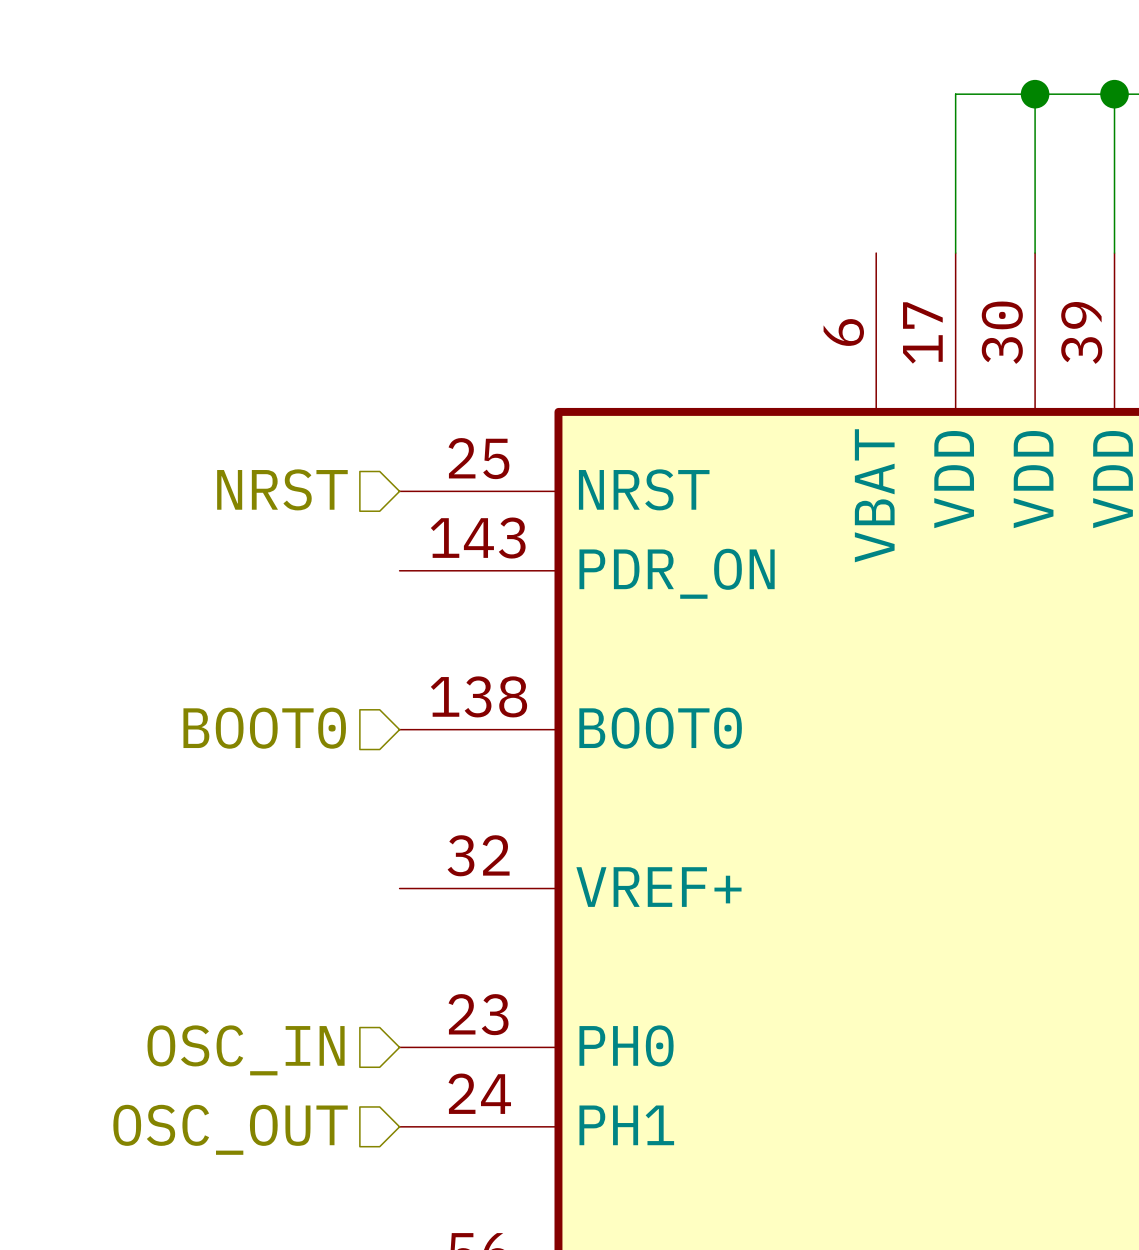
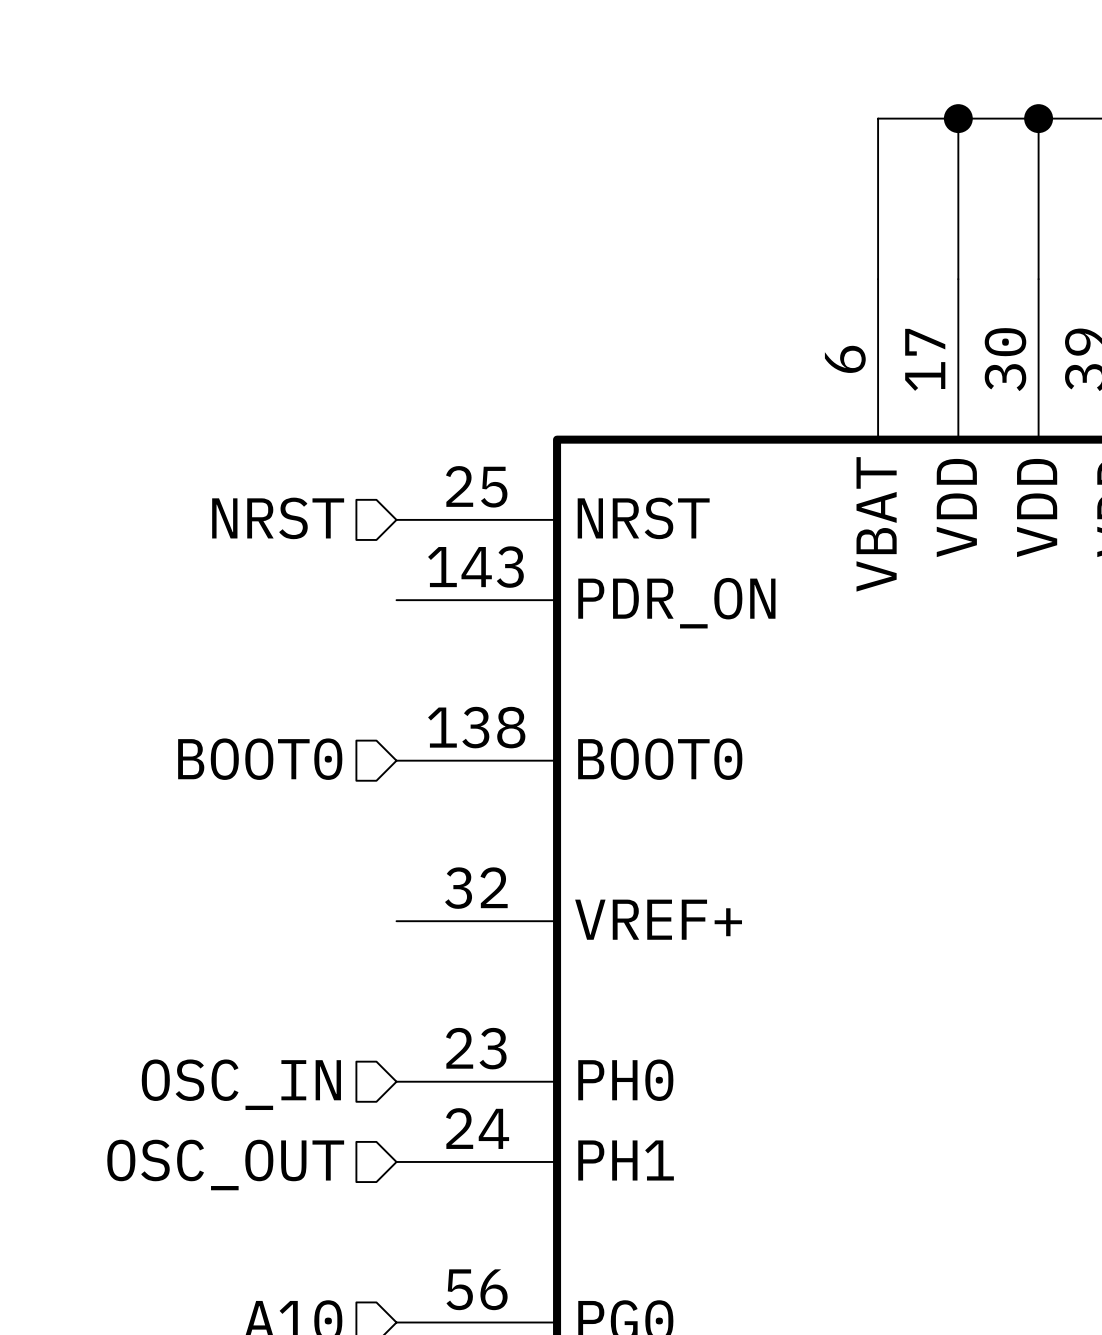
wire: none -> (958, 118) (878, 118) (878, 279)
junction: none -> (958, 118)

